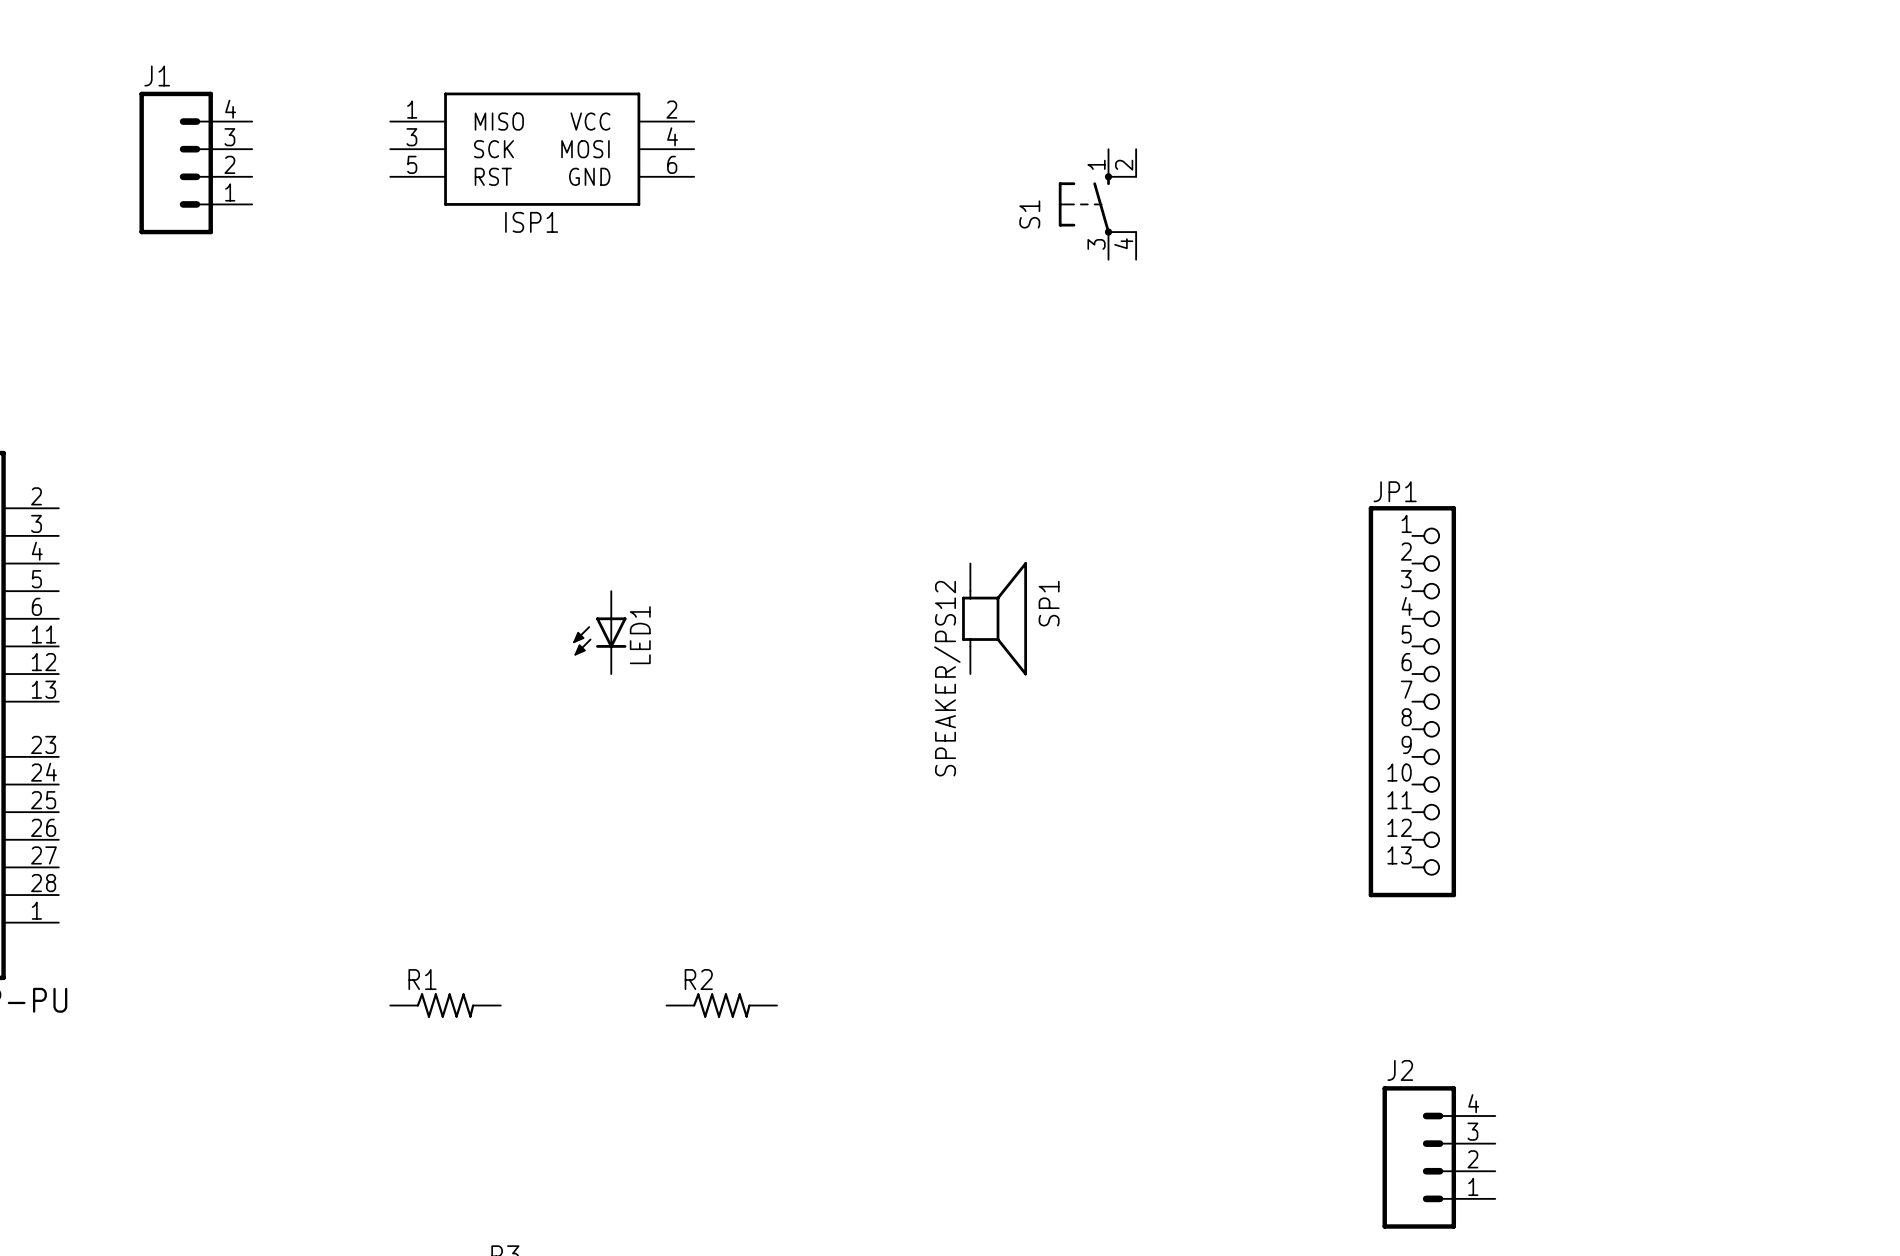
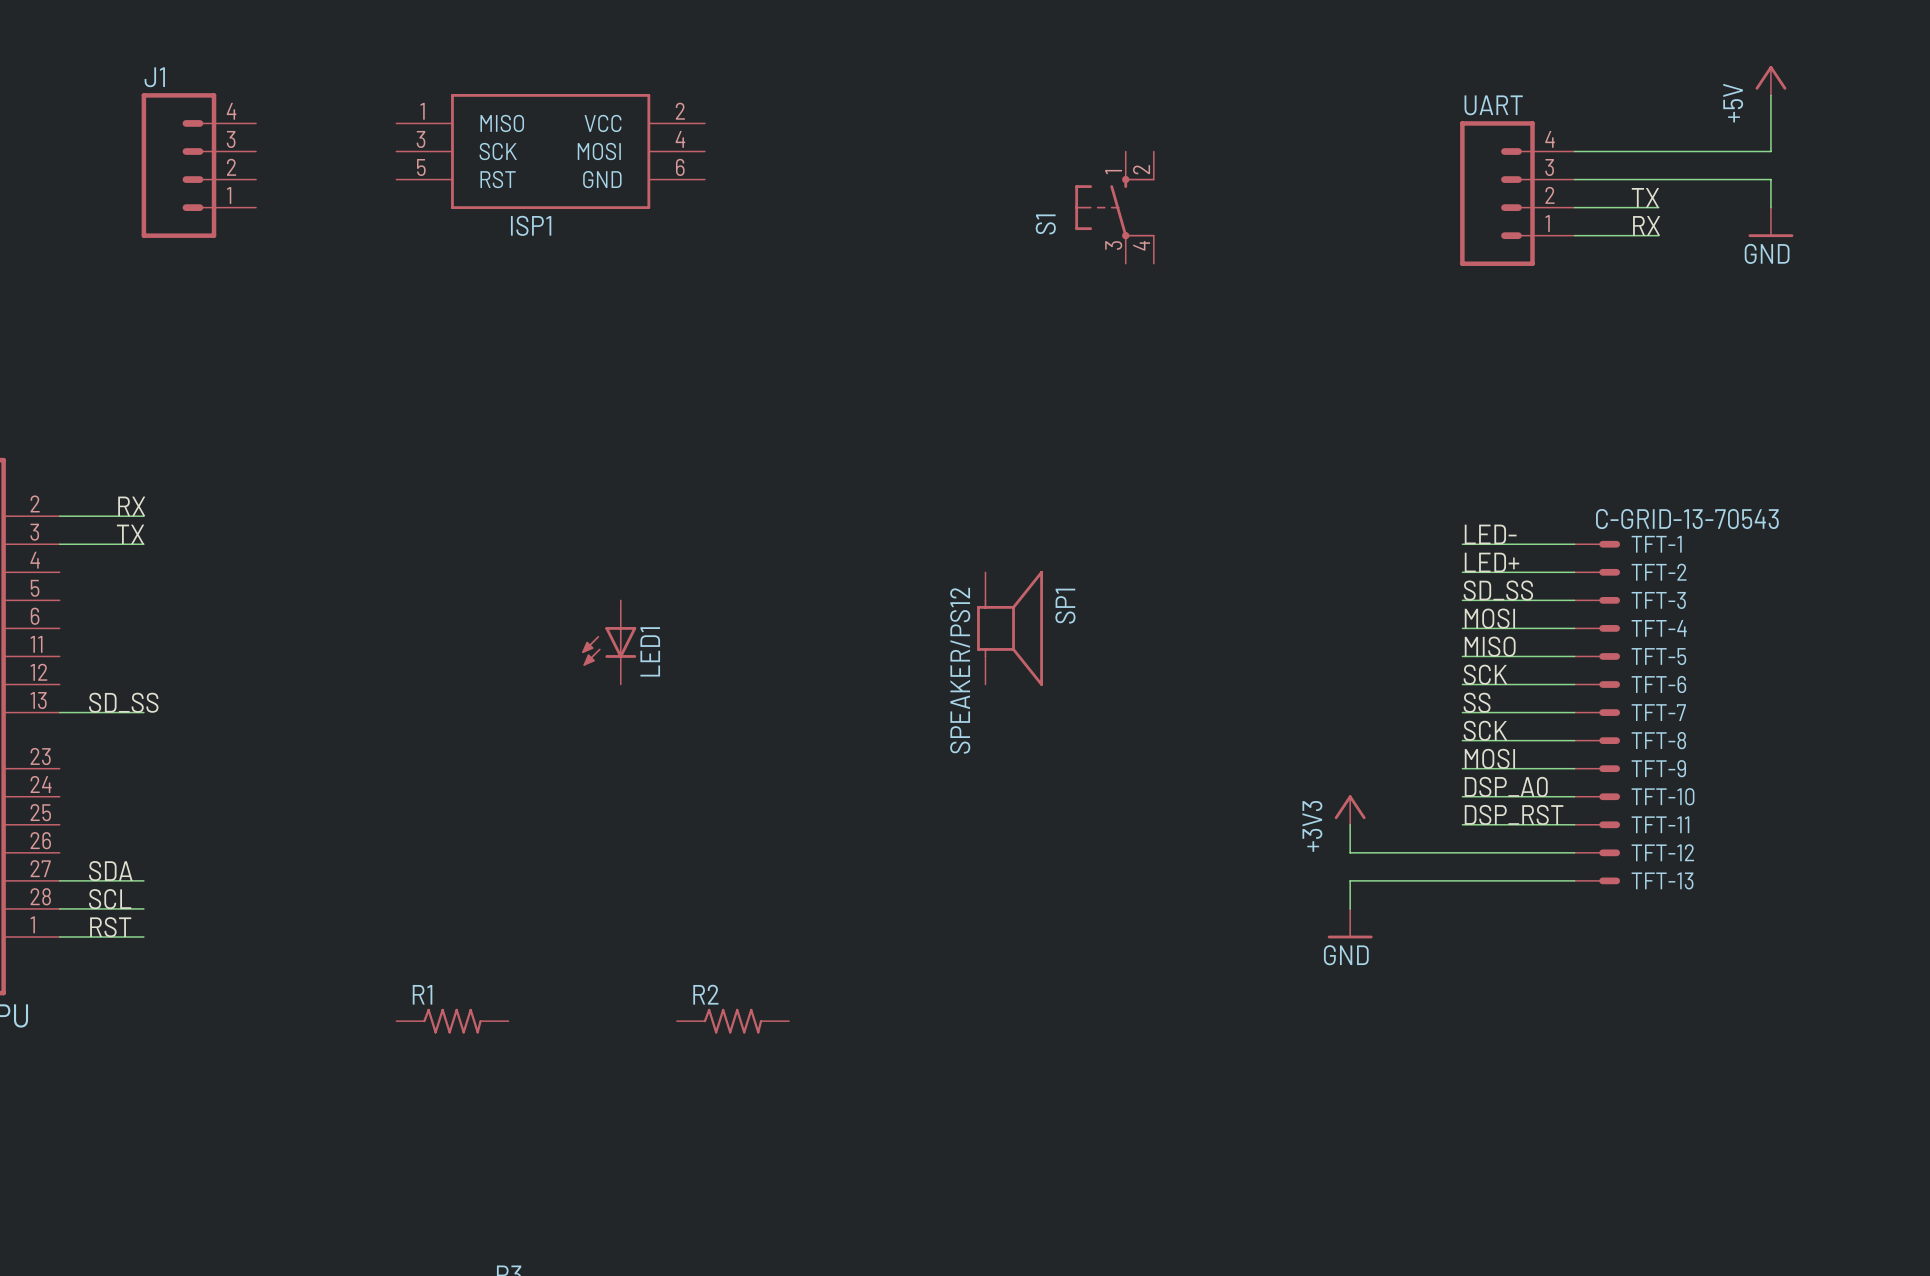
power symbol: none -> +5V (1770, 80)
wire: none -> (1770, 95) (1770, 151) (1574, 151)
wire: none -> (1574, 179) (1770, 179) (1770, 207)
UART: none -> (1517, 193)
label: none -> TX (1645, 197)
wire: none -> (1574, 207) (1658, 207)
power symbol: none -> GND (1770, 222)
label: none -> RX (1646, 225)
wire: none -> (1574, 235) (1658, 235)
label: none -> RX (131, 506)
wire: none -> (59, 516) (143, 516)
label: none -> TX (130, 534)
label: none -> LED- (1490, 534)
wire: none -> (59, 544) (143, 544)
wire: none -> (1462, 544) (1574, 544)
TFT-1: none -> C-GRID-13-70543 (1597, 544)
label: none -> LED+ (1491, 562)
wire: none -> (1462, 572) (1574, 572)
TFT-2: none -> (1597, 572)
label: none -> SD_SS (1498, 590)
wire: none -> (1462, 600) (1574, 600)
TFT-3: none -> (1597, 600)
label: none -> MOSI (1489, 618)
wire: none -> (1462, 628) (1574, 628)
TFT-4: none -> (1597, 628)
label: none -> MISO (1490, 646)
wire: none -> (1462, 656) (1574, 656)
TFT-5: none -> (1597, 656)
label: none -> SCK (1485, 674)
wire: none -> (1462, 684) (1574, 684)
TFT-6: none -> (1597, 684)
label: none -> SS (1477, 702)
label: none -> SD_SS (123, 702)
wire: none -> (59, 712) (143, 712)
JP1: (1412, 701) -> none
wire: none -> (1462, 712) (1574, 712)
TFT-7: none -> (1597, 712)
label: none -> SCK (1485, 730)
wire: none -> (1462, 740) (1574, 740)
TFT-8: none -> (1597, 740)
label: none -> MOSI (1489, 758)
wire: none -> (1462, 768) (1574, 768)
TFT-9: none -> (1597, 768)
label: none -> DSP_A0 (1506, 786)
wire: none -> (1462, 796) (1574, 796)
TFT-10: none -> (1597, 796)
power symbol: none -> +3V3 (1350, 810)
label: none -> DSP_RST (1514, 814)
wire: none -> (1350, 824) (1350, 852) (1574, 852)
wire: none -> (1462, 824) (1574, 824)
TFT-11: none -> (1597, 824)
TFT-12: none -> (1597, 852)
label: none -> SDA (110, 871)
wire: none -> (59, 880) (143, 880)
wire: none -> (1574, 880) (1350, 880) (1350, 908)
TFT-13: none -> (1597, 880)
label: none -> SCL (110, 899)
wire: none -> (59, 908) (143, 908)
power symbol: none -> GND (1350, 923)
label: none -> RST (110, 927)
wire: none -> (59, 936) (143, 936)
J2: (1438, 1157) -> none

